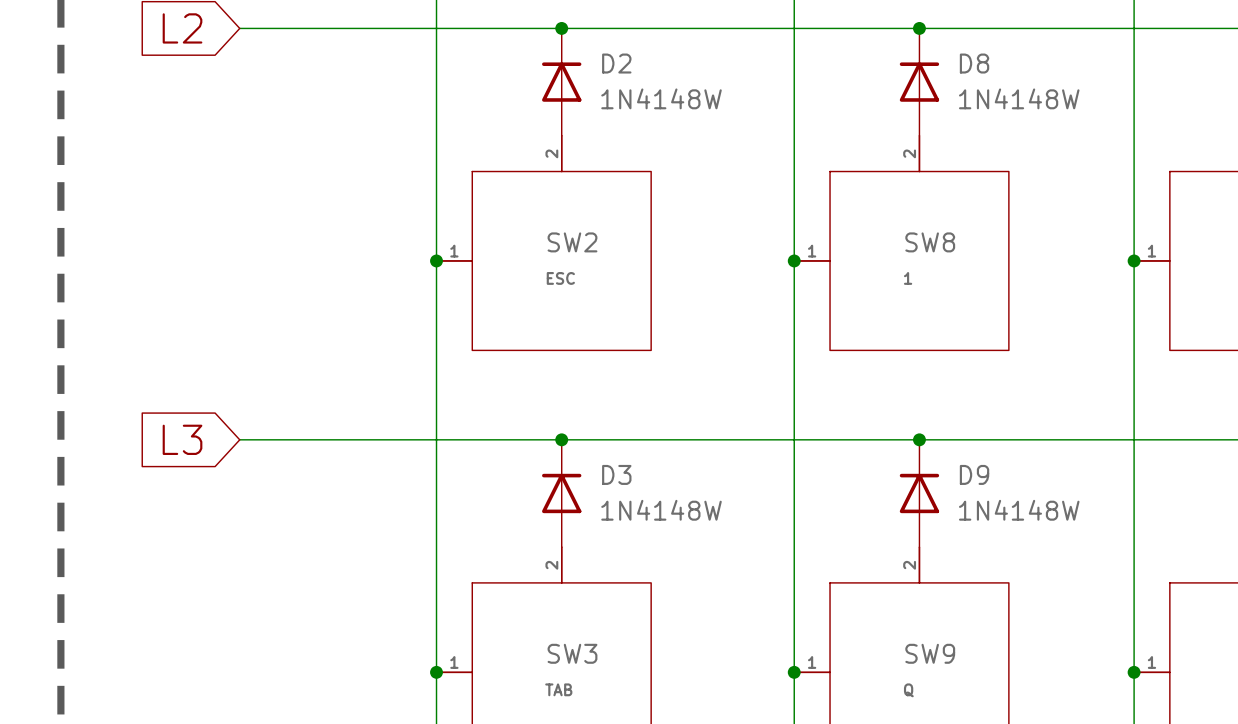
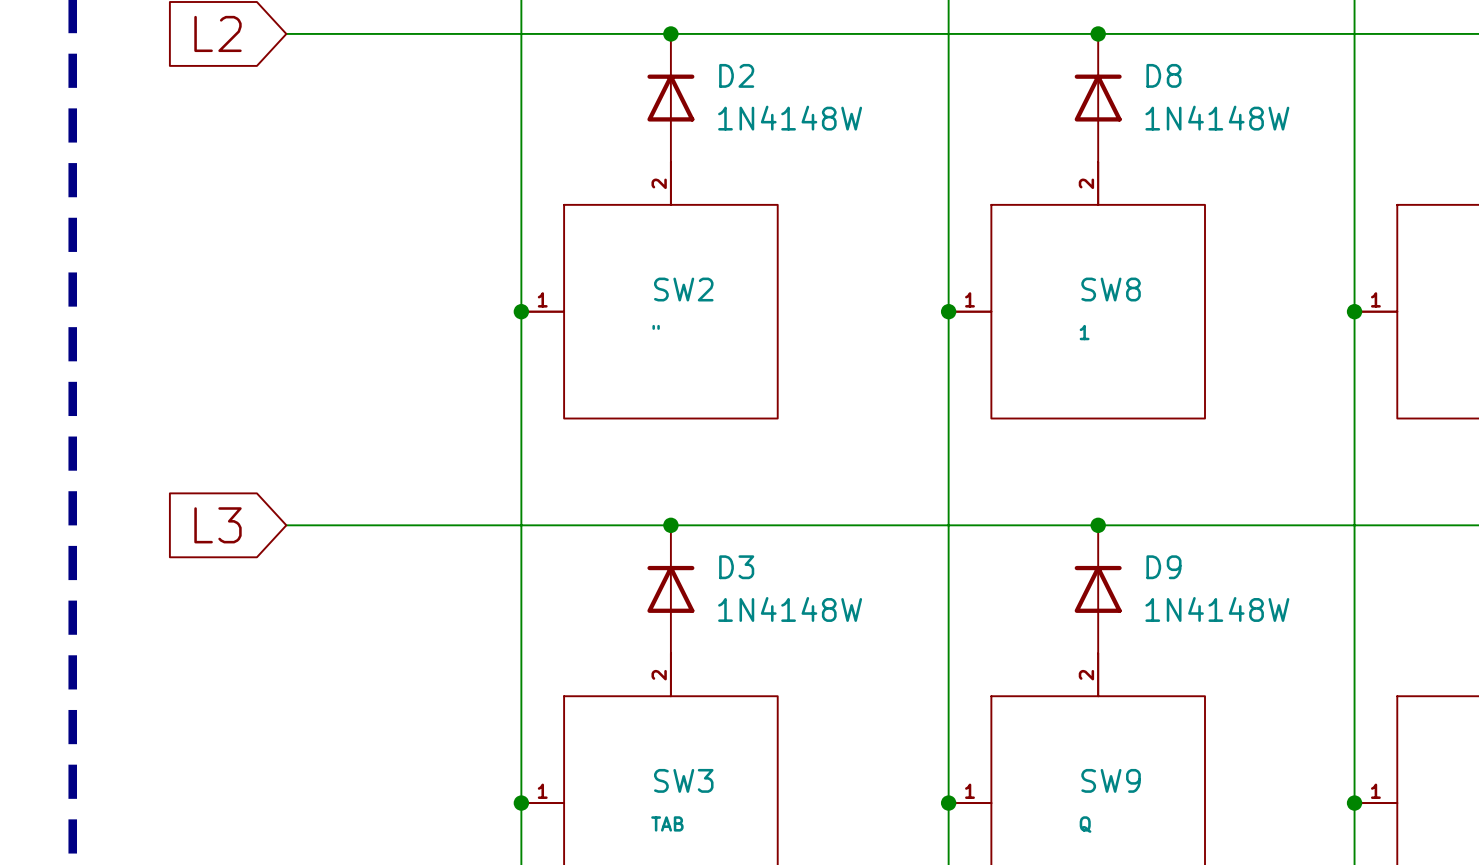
SW2 text: ESC (560, 278) -> " (656, 327)

